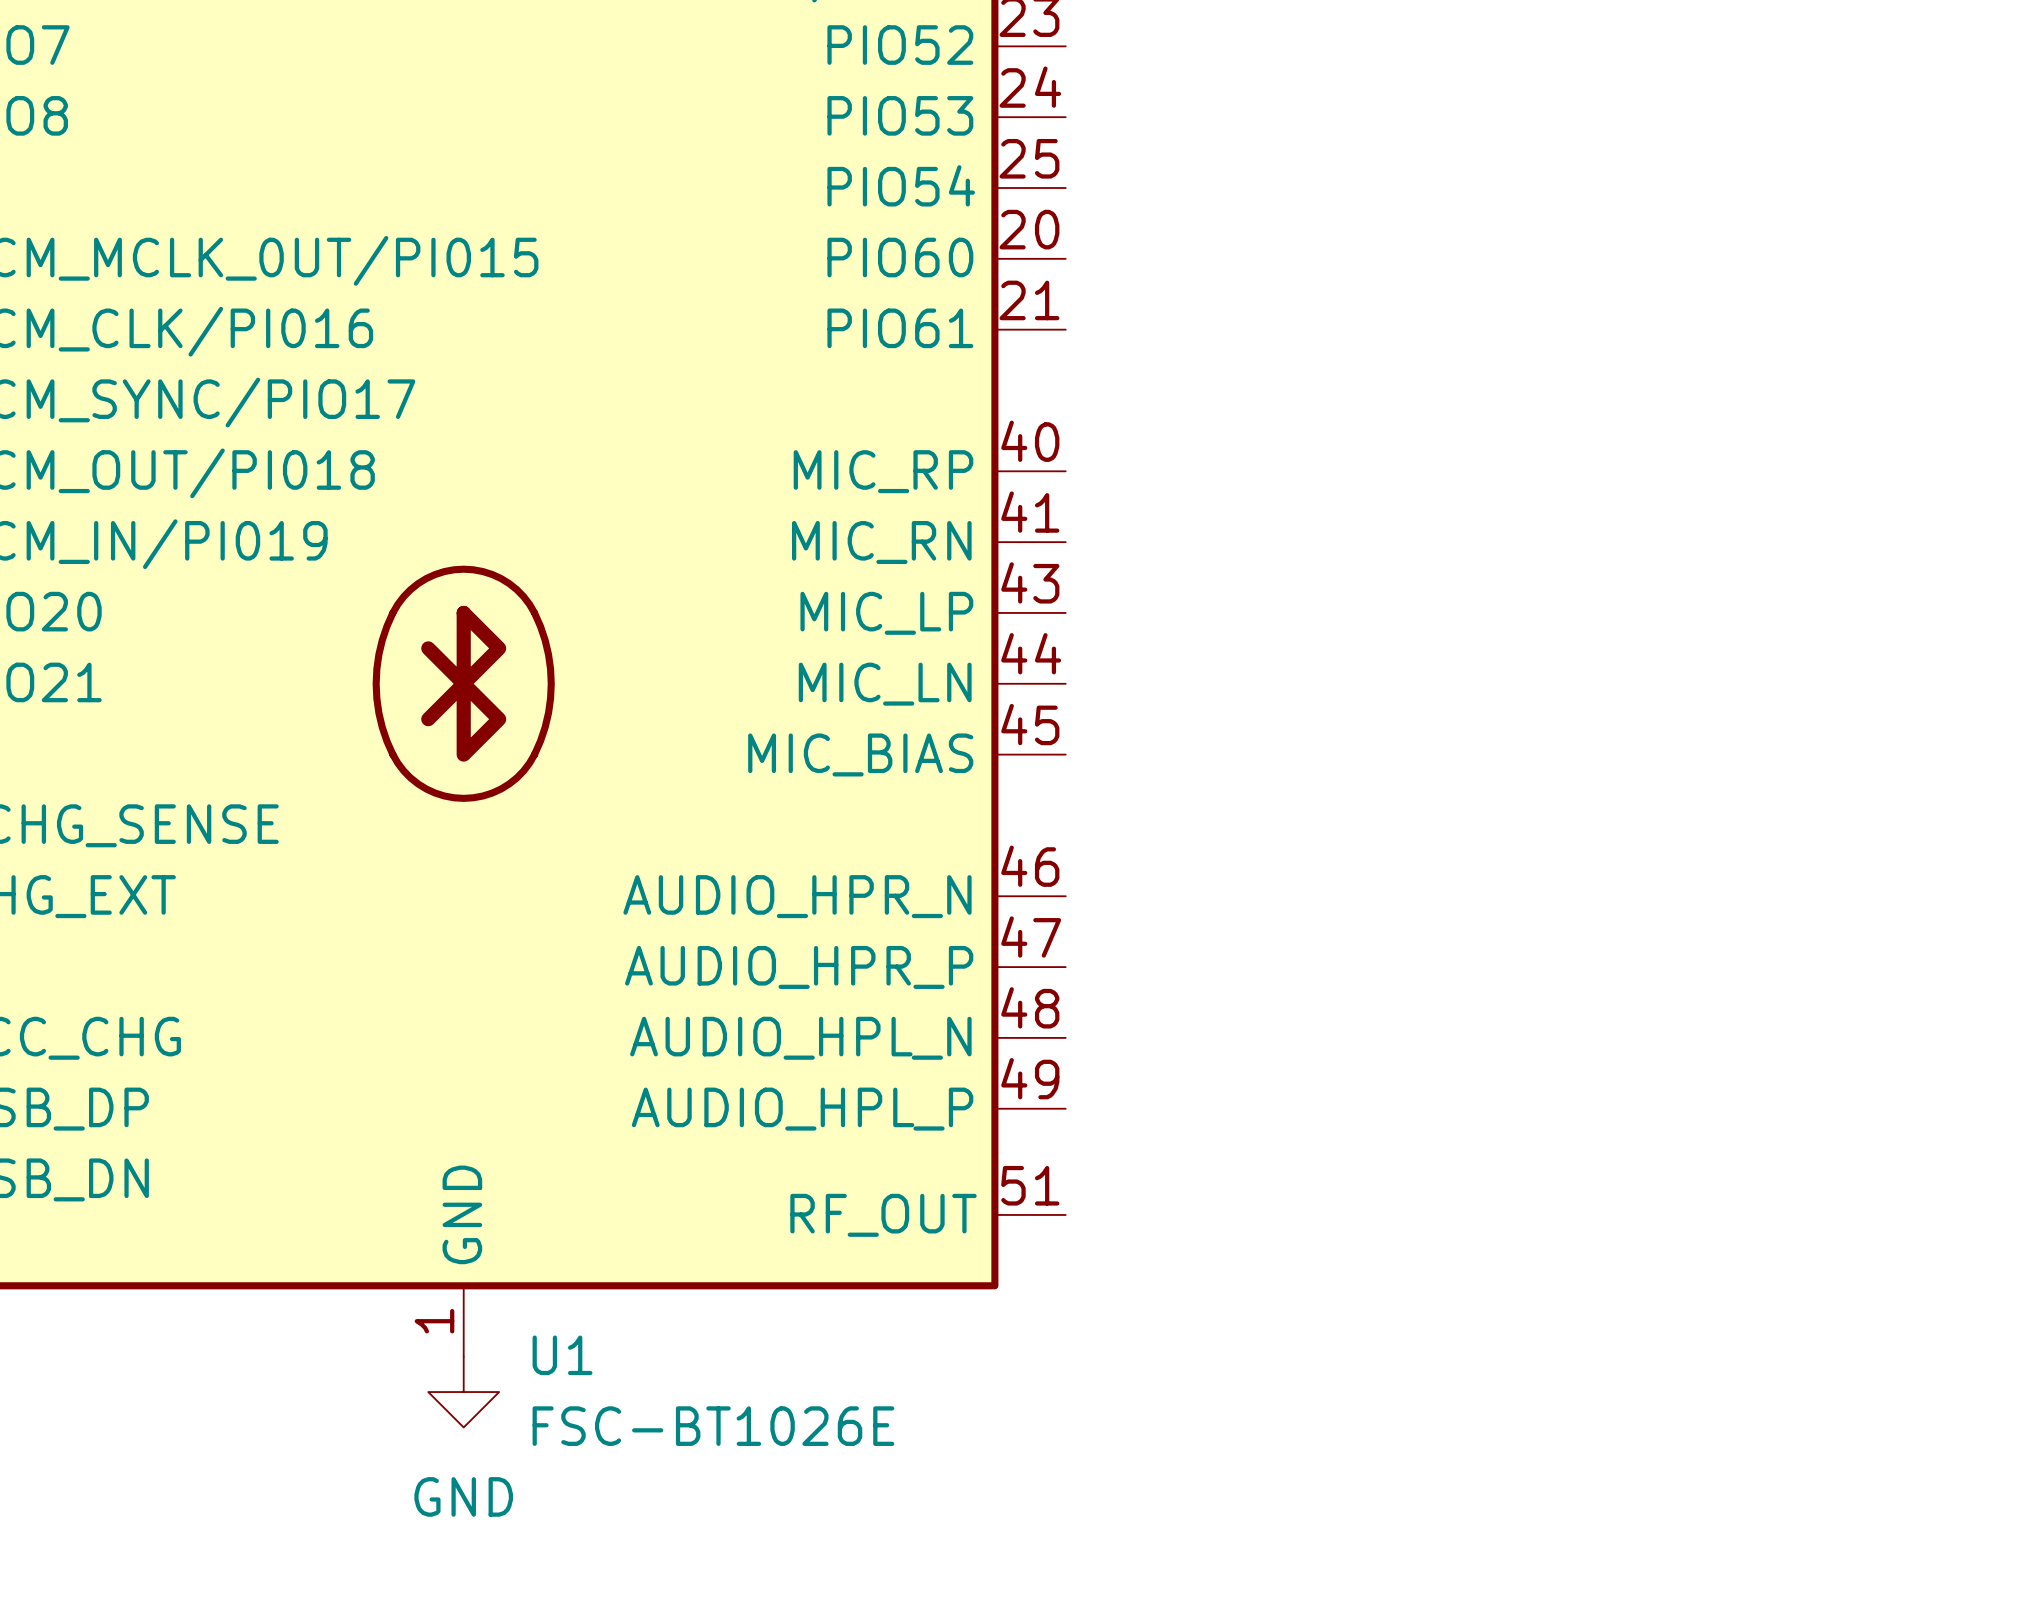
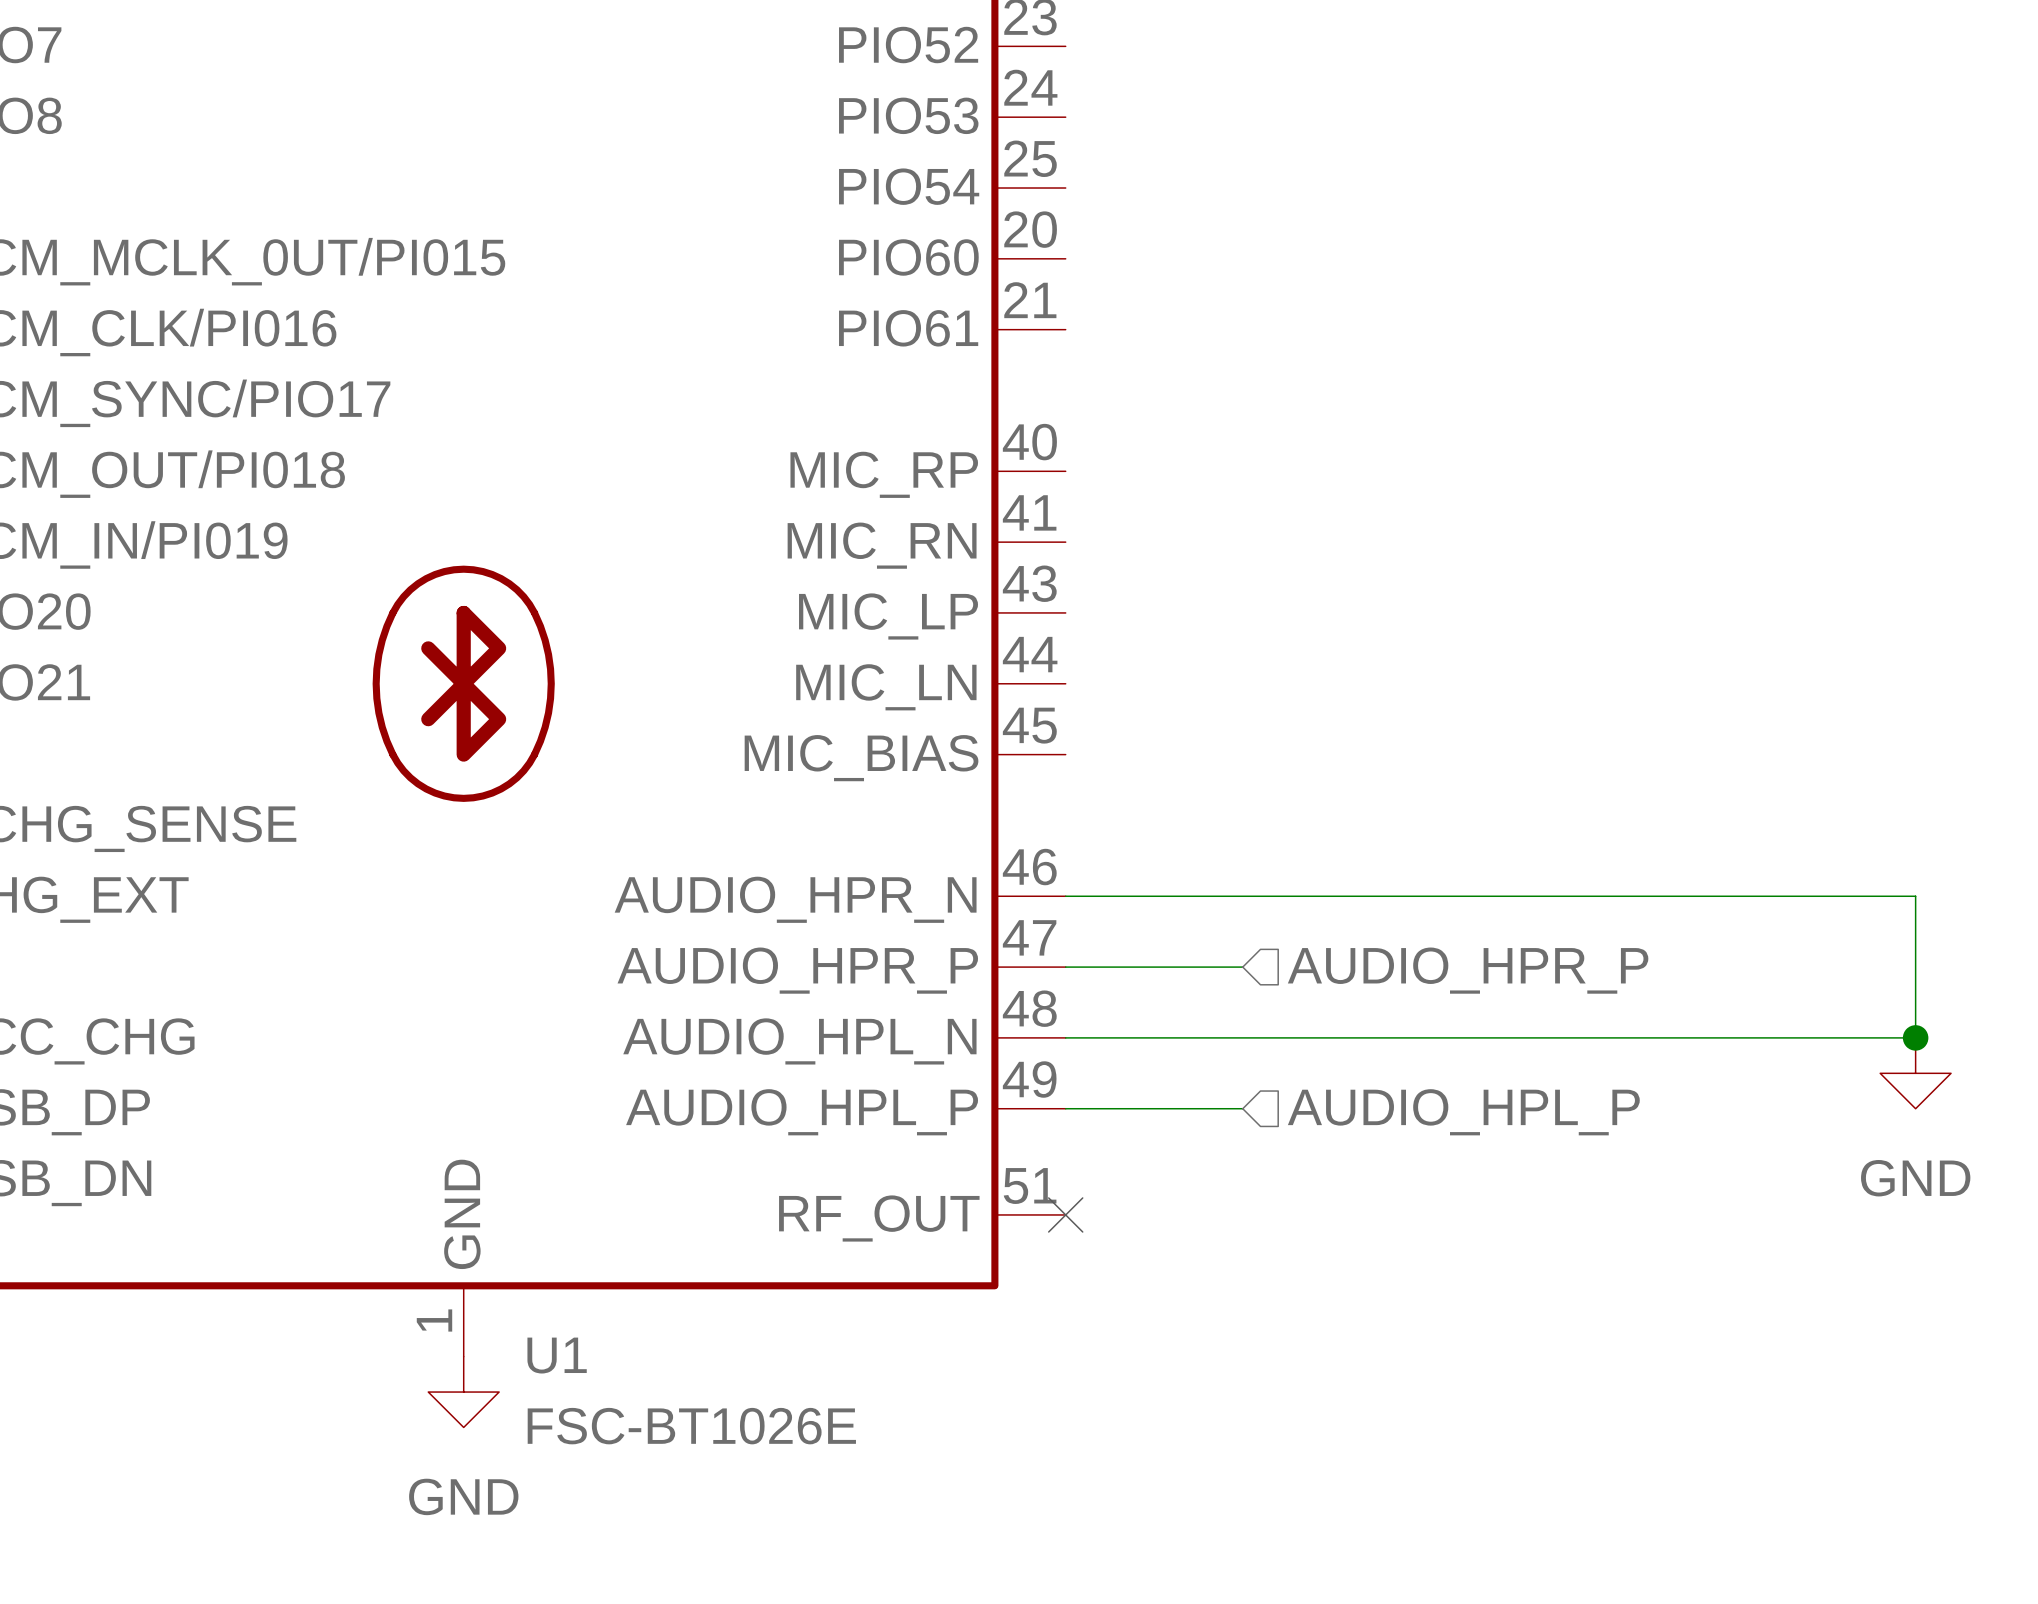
wire: none -> (1065, 896) (1915, 896) (1915, 1037) (1065, 1037)
wire: none -> (1065, 967) (1242, 967)
hierarchical label: none -> AUDIO_HPR_P (1468, 970)
junction: none -> (1915, 1037)
power symbol: none -> GND (1915, 1073)
wire: none -> (1065, 1108) (1242, 1108)
hierarchical label: none -> AUDIO_HPL_P (1463, 1112)
no-connect mark: none -> (1065, 1214)

